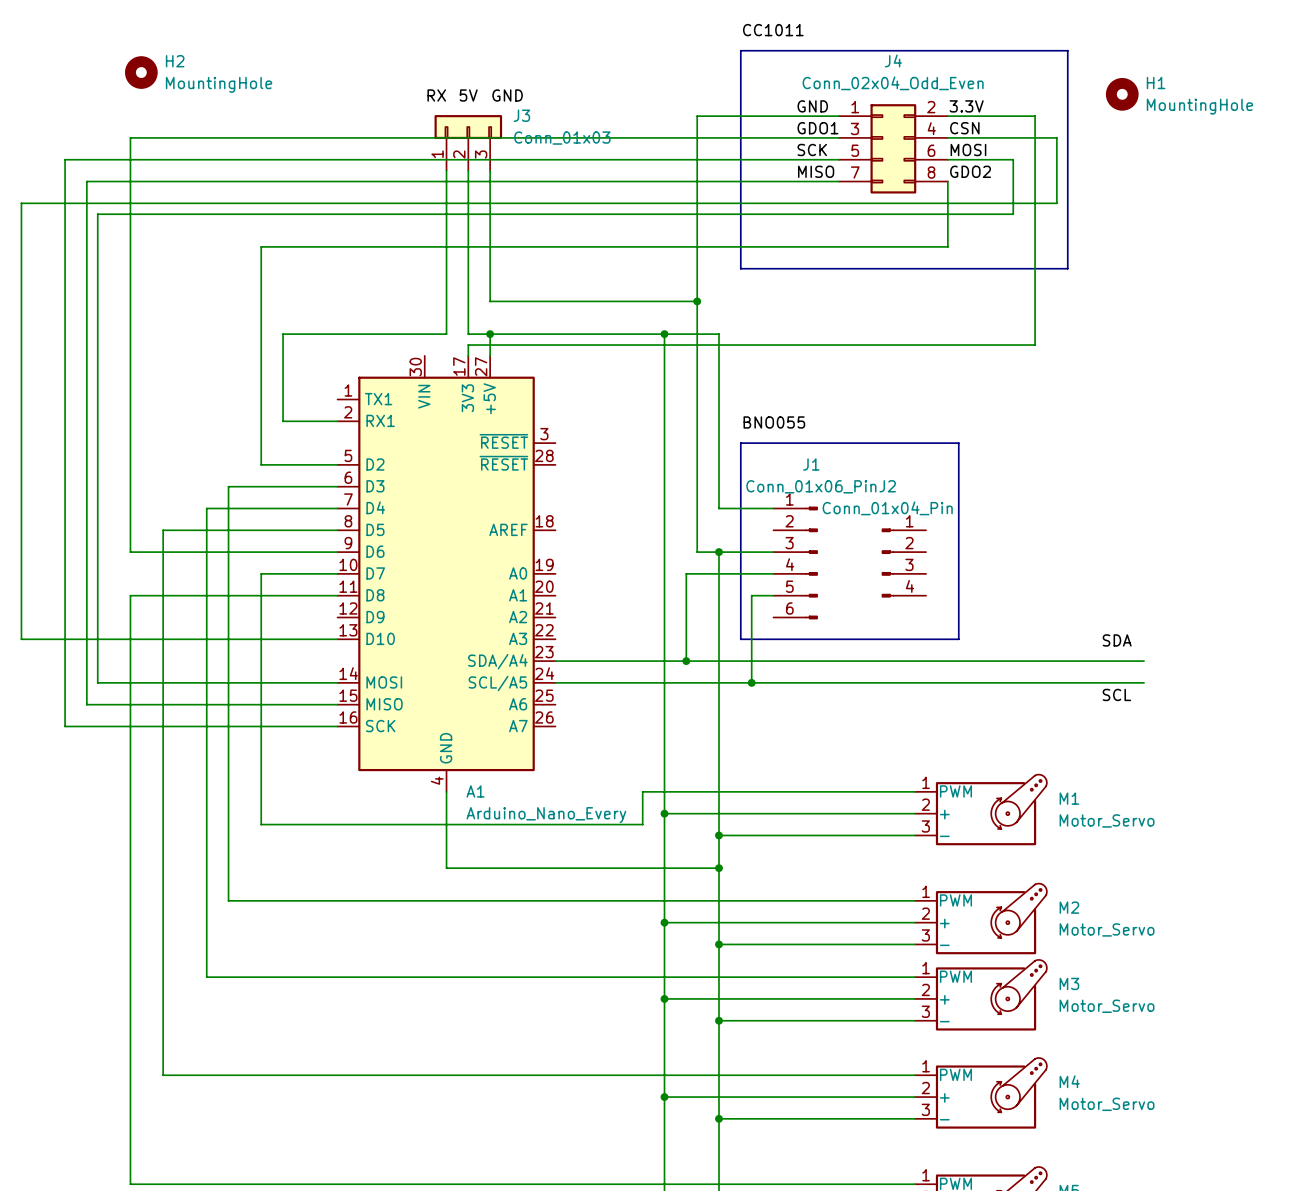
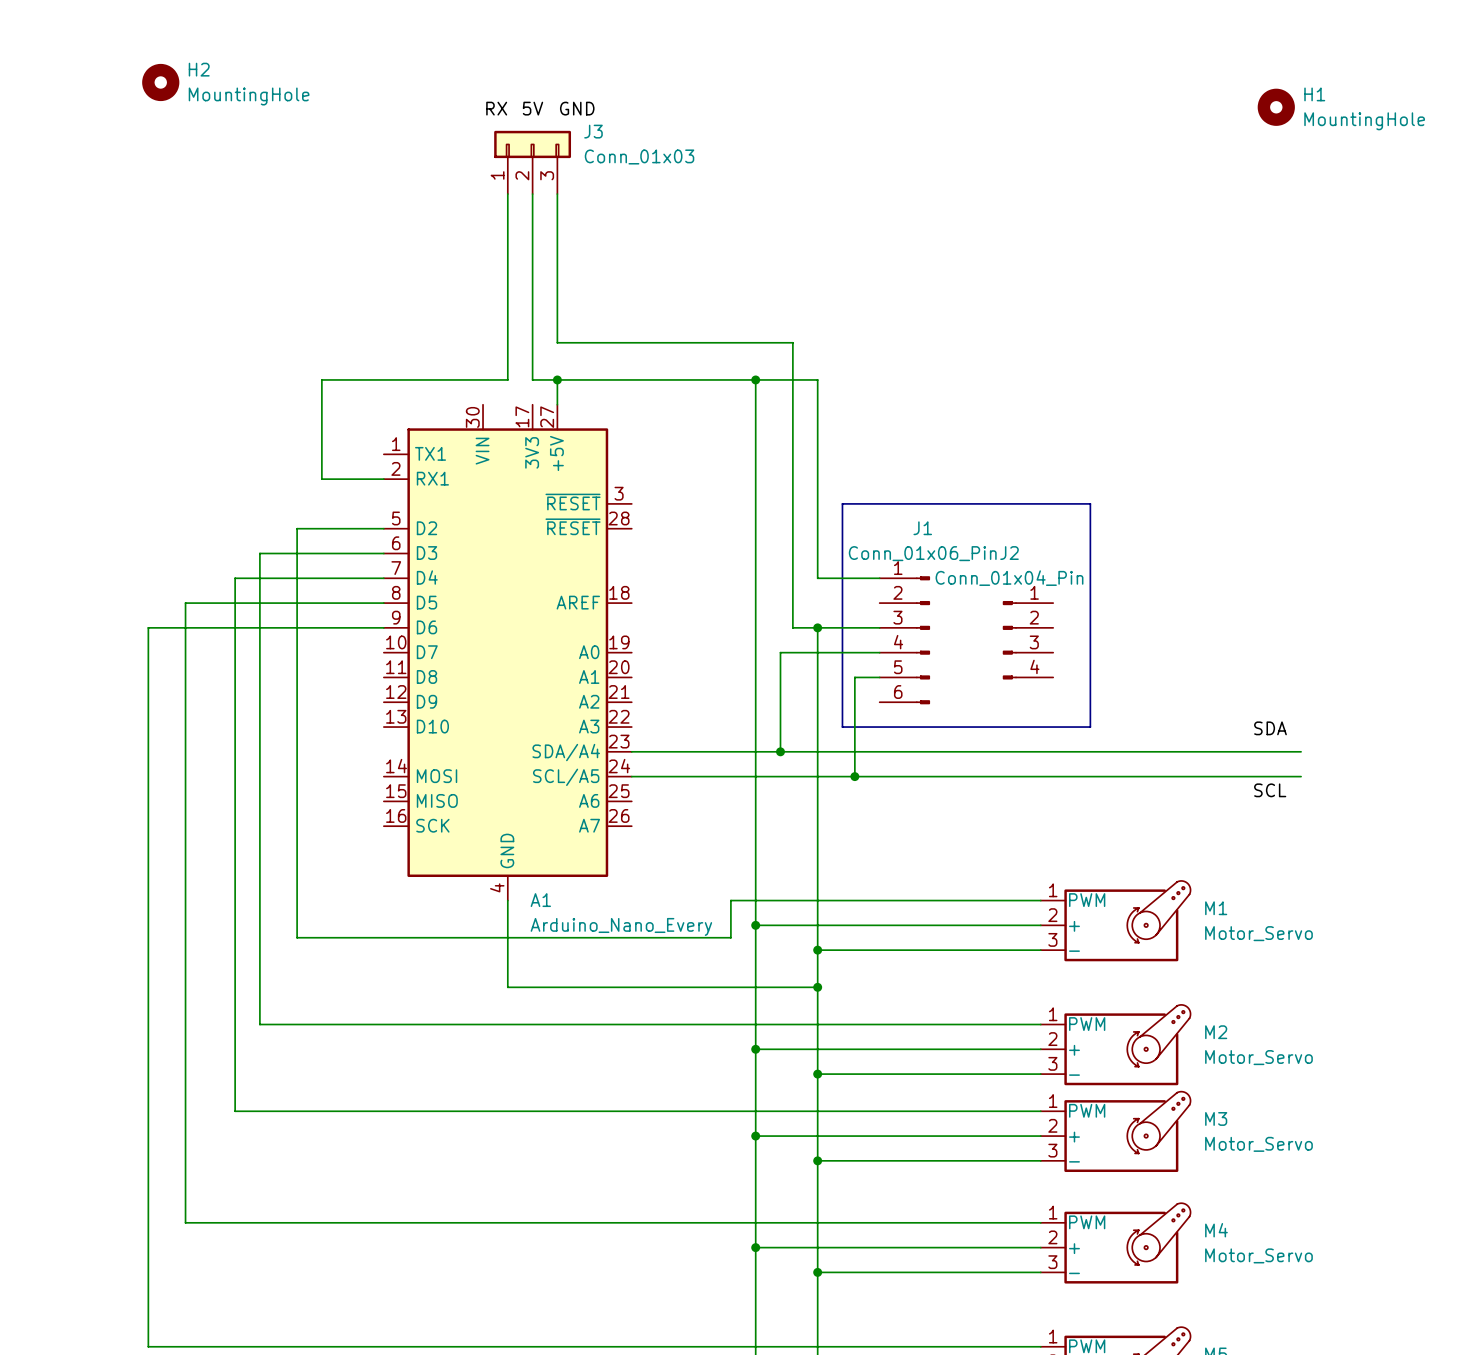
label: CC1011 (773, 30) -> none
line: (740, 50) (1067, 50) (1067, 268) (740, 268) (740, 50) -> none
label: GND (812, 106) -> none
label: 3.3V (966, 106) -> none
wire: (838, 116) (697, 116) (697, 301) -> none
wire: (947, 116) (1035, 116) (1035, 345) (468, 345) (468, 355) -> none
label: GDO1 (817, 128) -> none
label: CSN (964, 128) -> none
wire: (838, 137) (130, 137) (130, 552) -> none
wire: (947, 137) (1056, 137) (1056, 203) (21, 203) (21, 639) (337, 639) -> none
J4: Conn_02x04_Odd_Even (893, 148) -> none
label: SCK (812, 150) -> none
label: MOSI (968, 150) -> none
wire: (838, 159) (65, 159) (65, 726) (337, 726) -> none
wire: (947, 159) (1013, 159) (1013, 214) (97, 214) (97, 682) (337, 682) -> none
label: MISO (816, 171) -> none
label: GDO2 (970, 171) -> none
wire: (838, 181) (86, 181) (86, 704) (337, 704) -> none
wire: (947, 181) (947, 246) (261, 246) (261, 464) -> none
junction: (697, 301) -> none
label: BNO055 (774, 422) -> none
wire: (261, 573) (337, 573) -> (297, 652) (297, 528)
wire: (130, 595) (337, 595) -> (148, 677) (148, 627)

